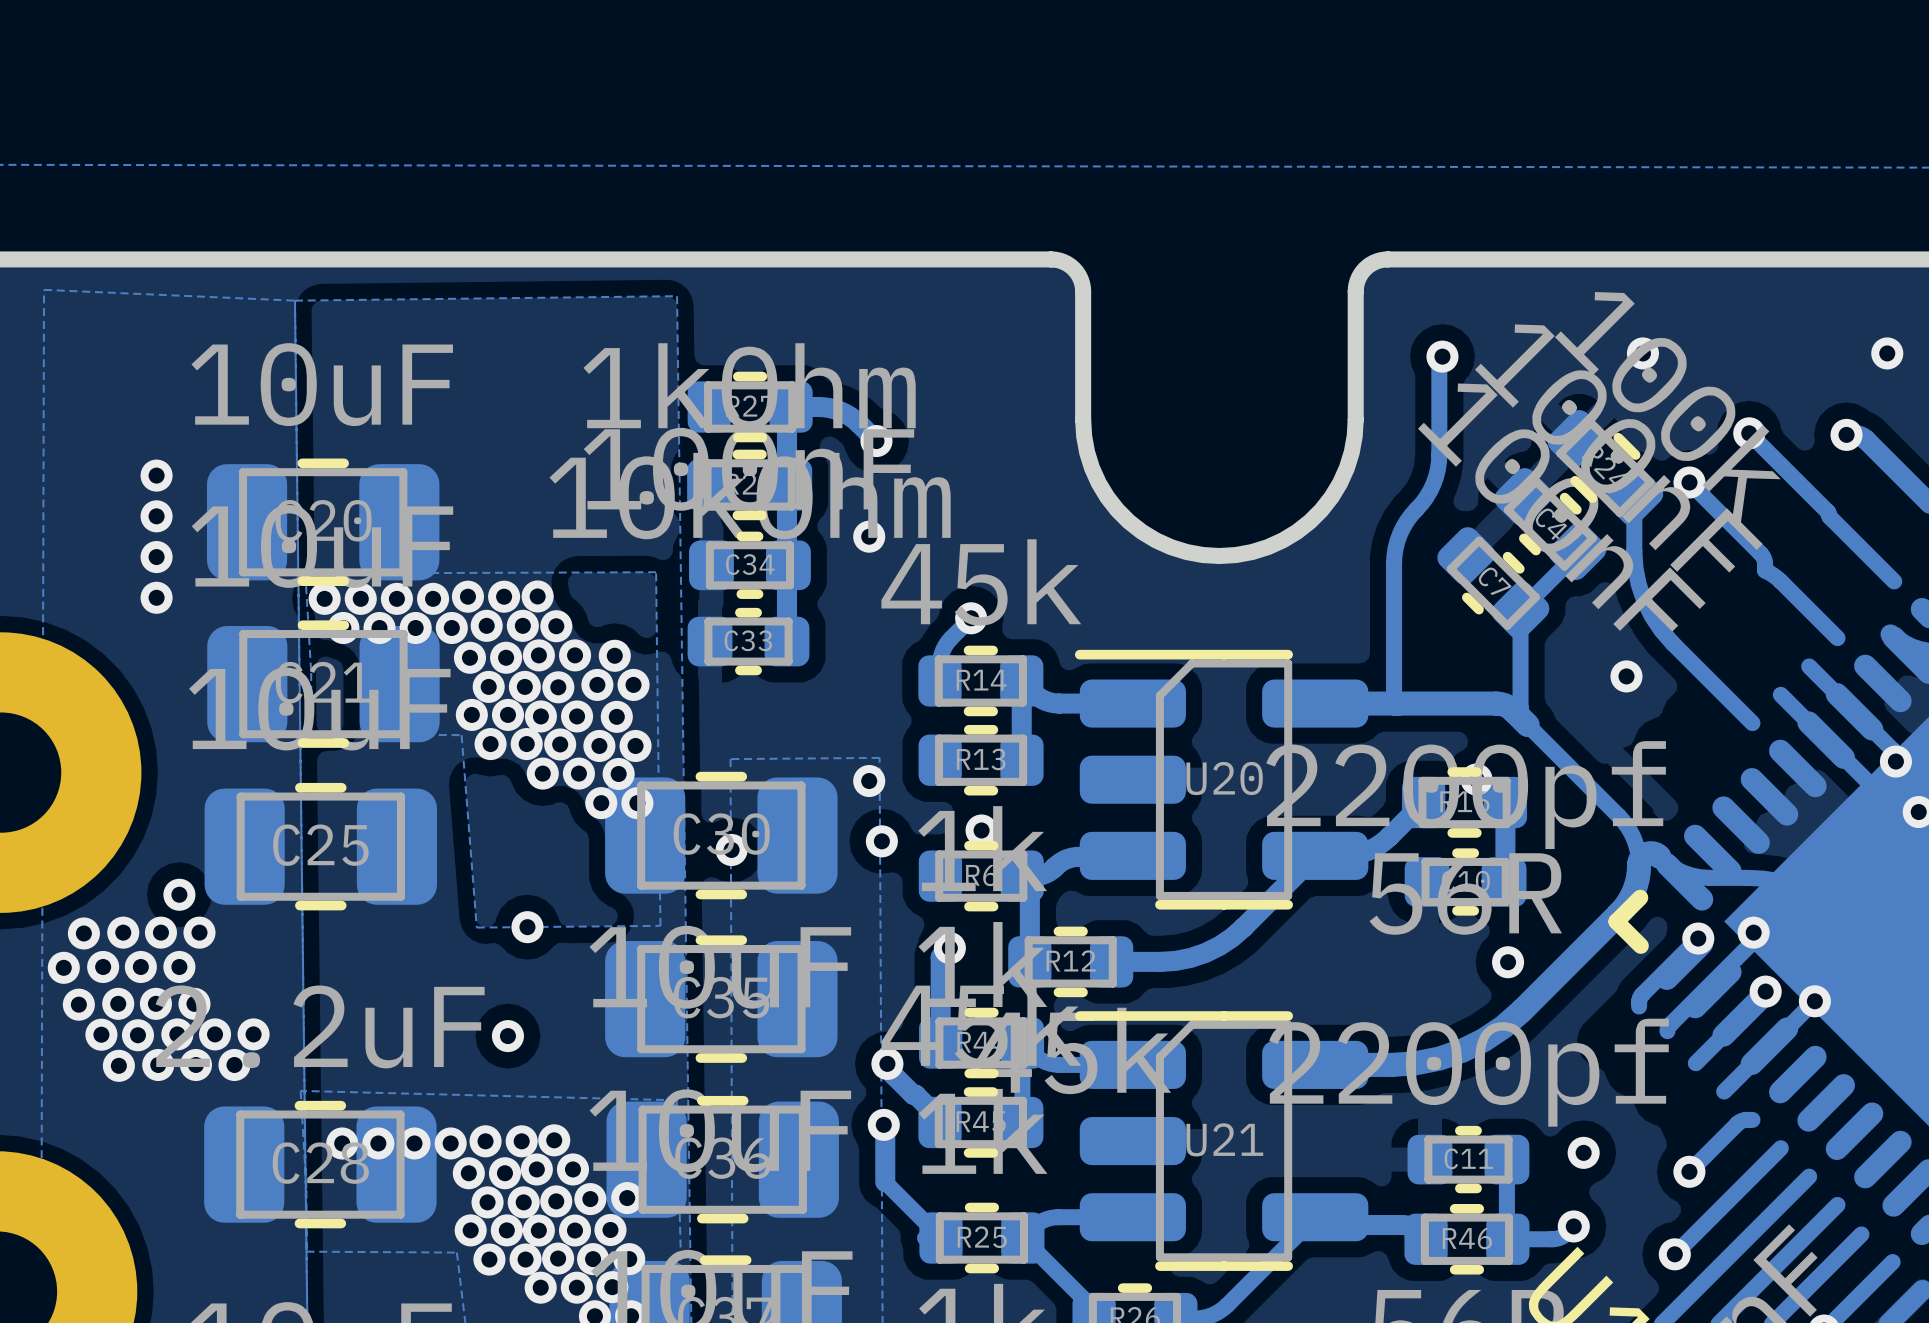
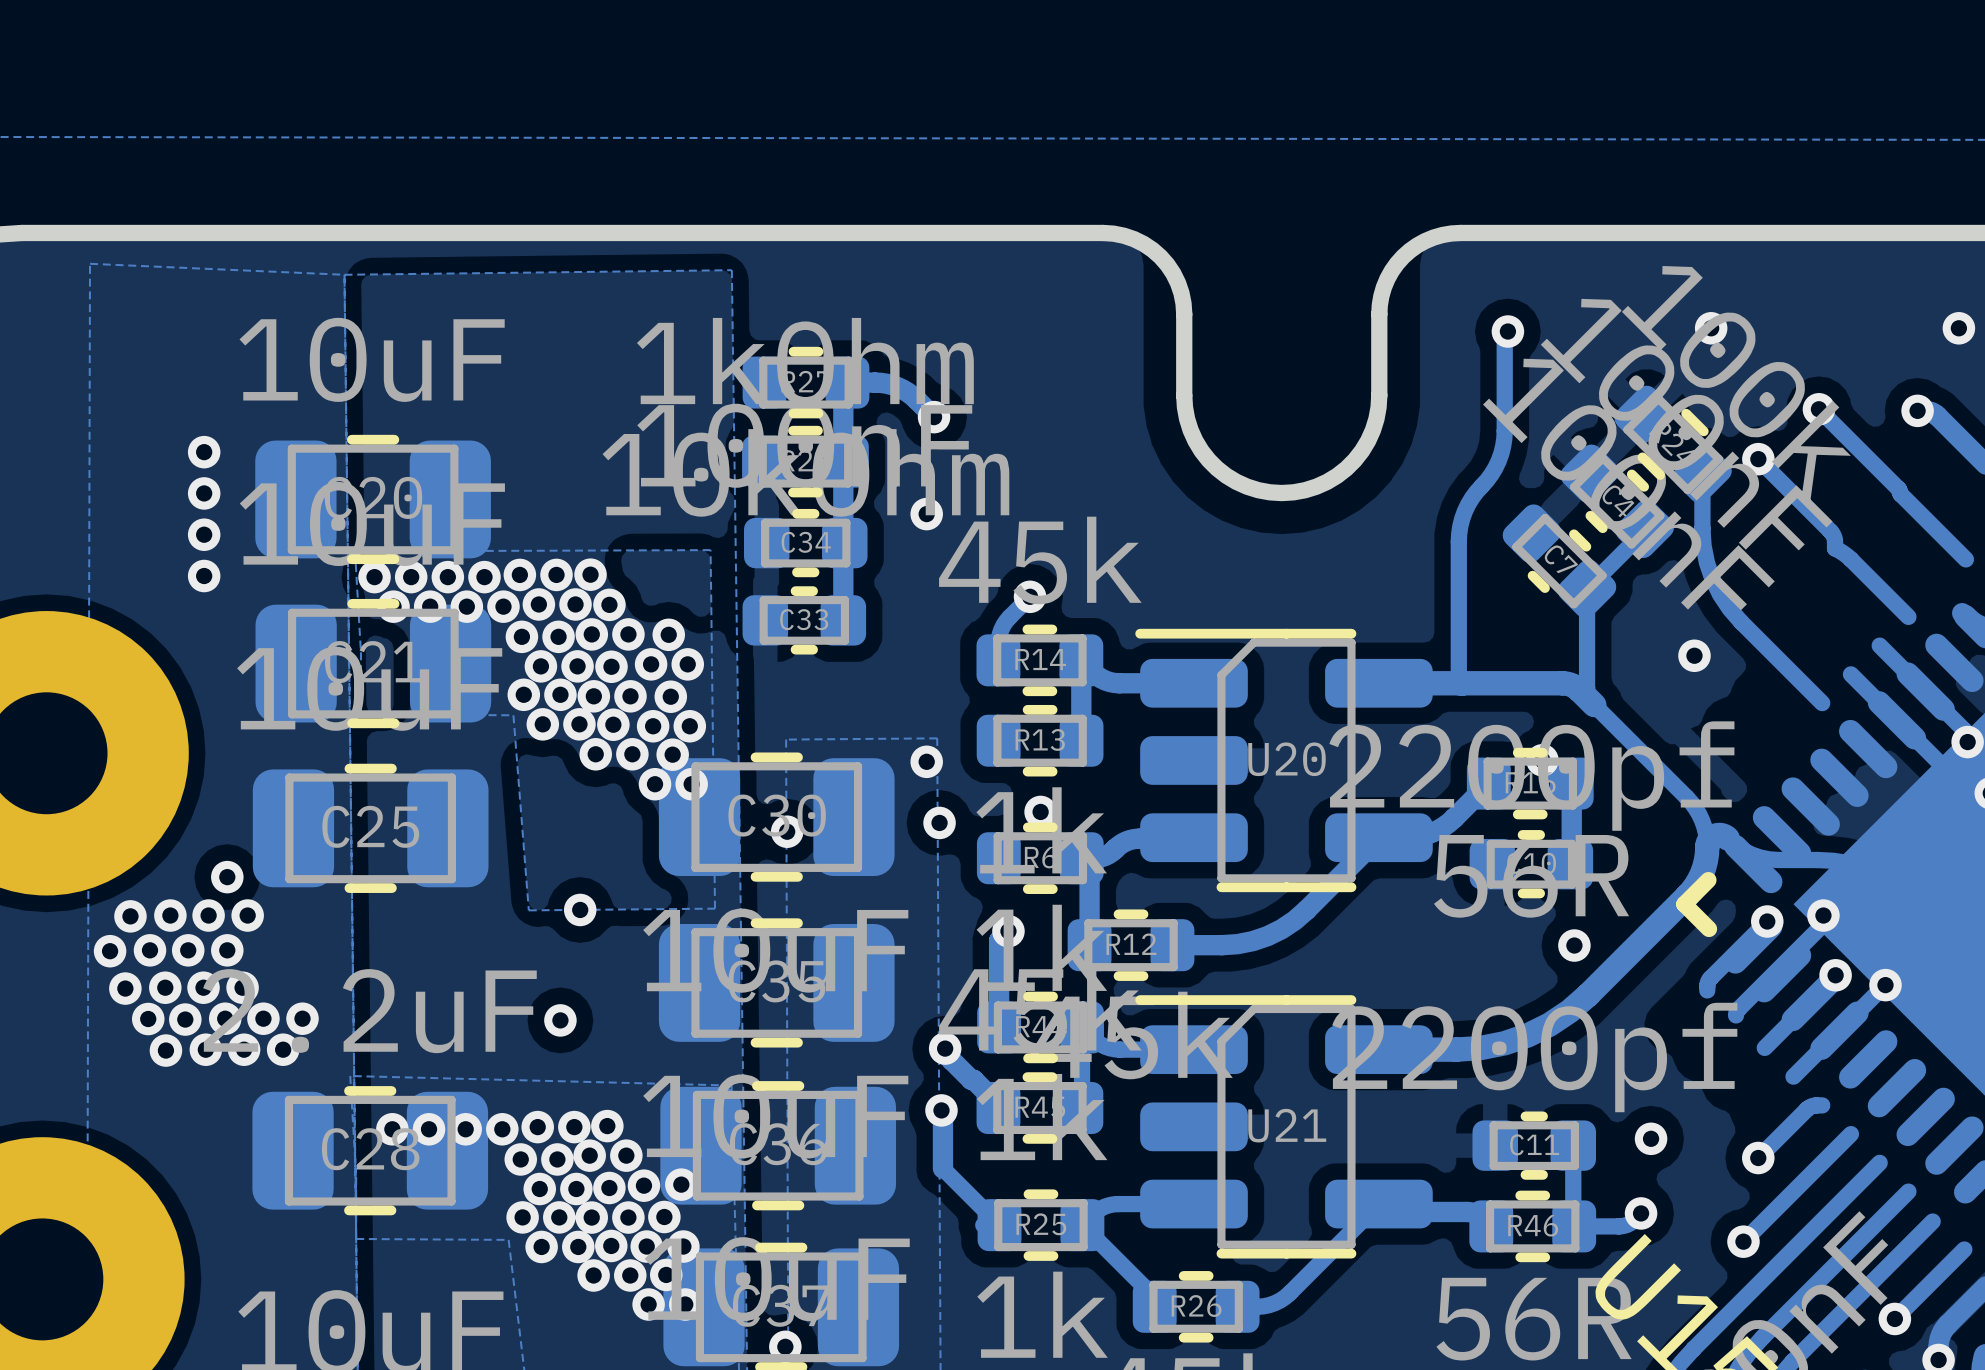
board edge: (1395, 259) (1380, 260) (1370, 264) (1362, 271) (1356, 284) (1354, 436) (1351, 452) (1340, 483) (1321, 510) (1296, 531) (1282, 540) (1252, 552) (1219, 556) (1186, 552) (1156, 540) (1142, 531) (1117, 510) (1098, 483) (1087, 452) (1084, 436) (1082, 283) (1076, 271) (1067, 263) (1055, 259) (1043, 259) -> (1460, 232) (1442, 235) (1417, 245) (1403, 256) (1387, 278) (1379, 305) (1378, 407) (1372, 430) (1362, 450) (1346, 468) (1327, 481) (1305, 490) (1281, 493) (1258, 490) (1236, 481) (1217, 468) (1201, 450) (1190, 430) (1184, 407) (1184, 314) (1178, 283) (1160, 256) (1143, 243) (1124, 235) (1102, 232)

